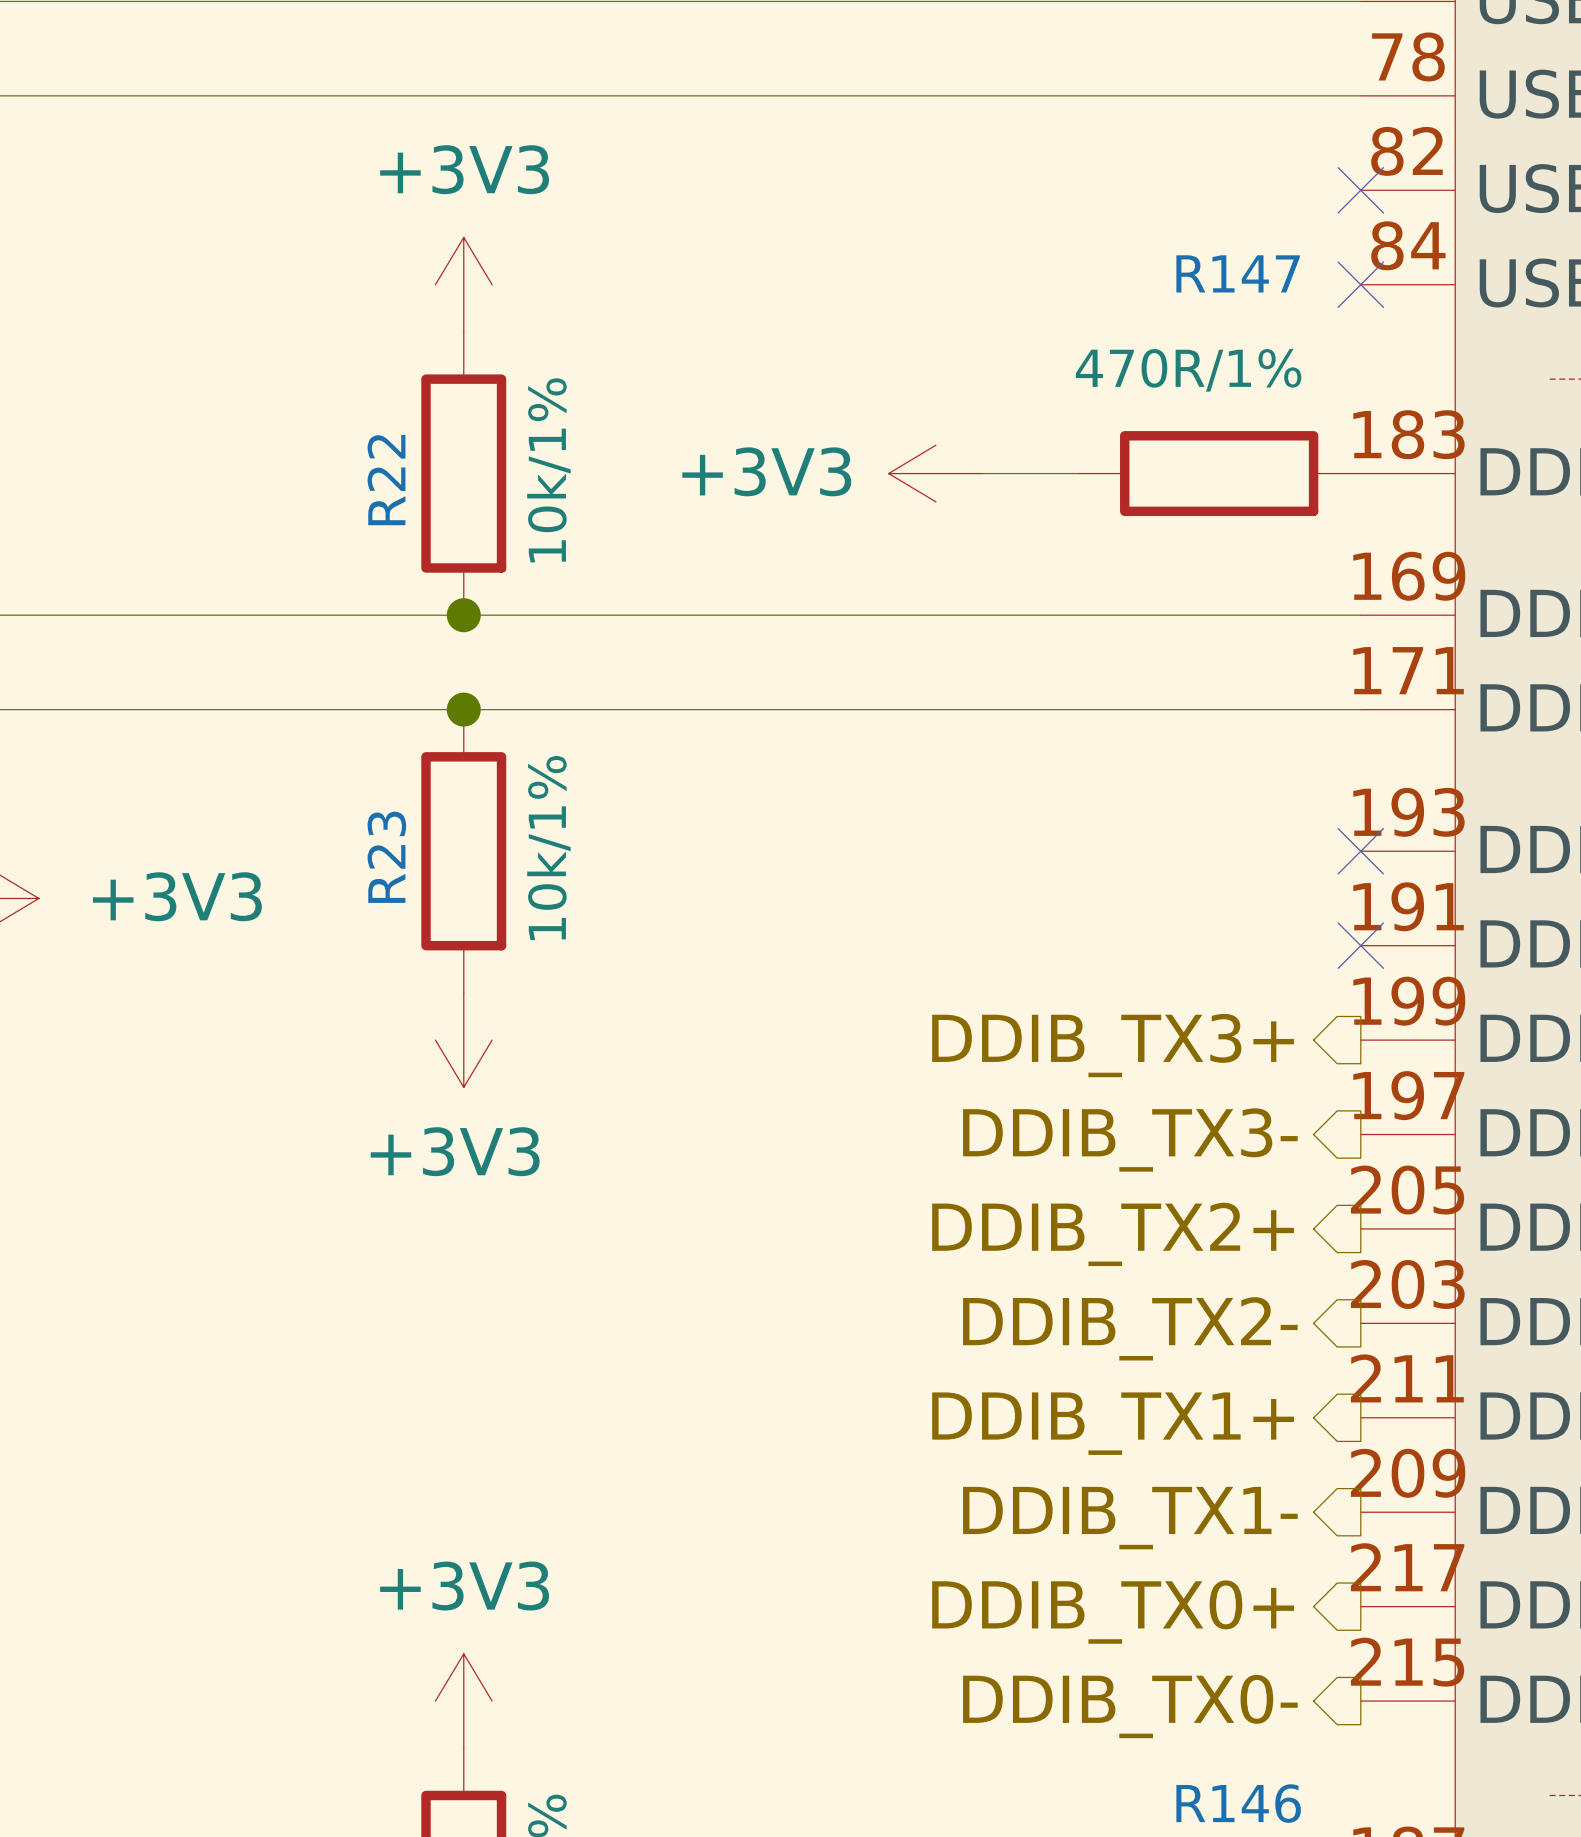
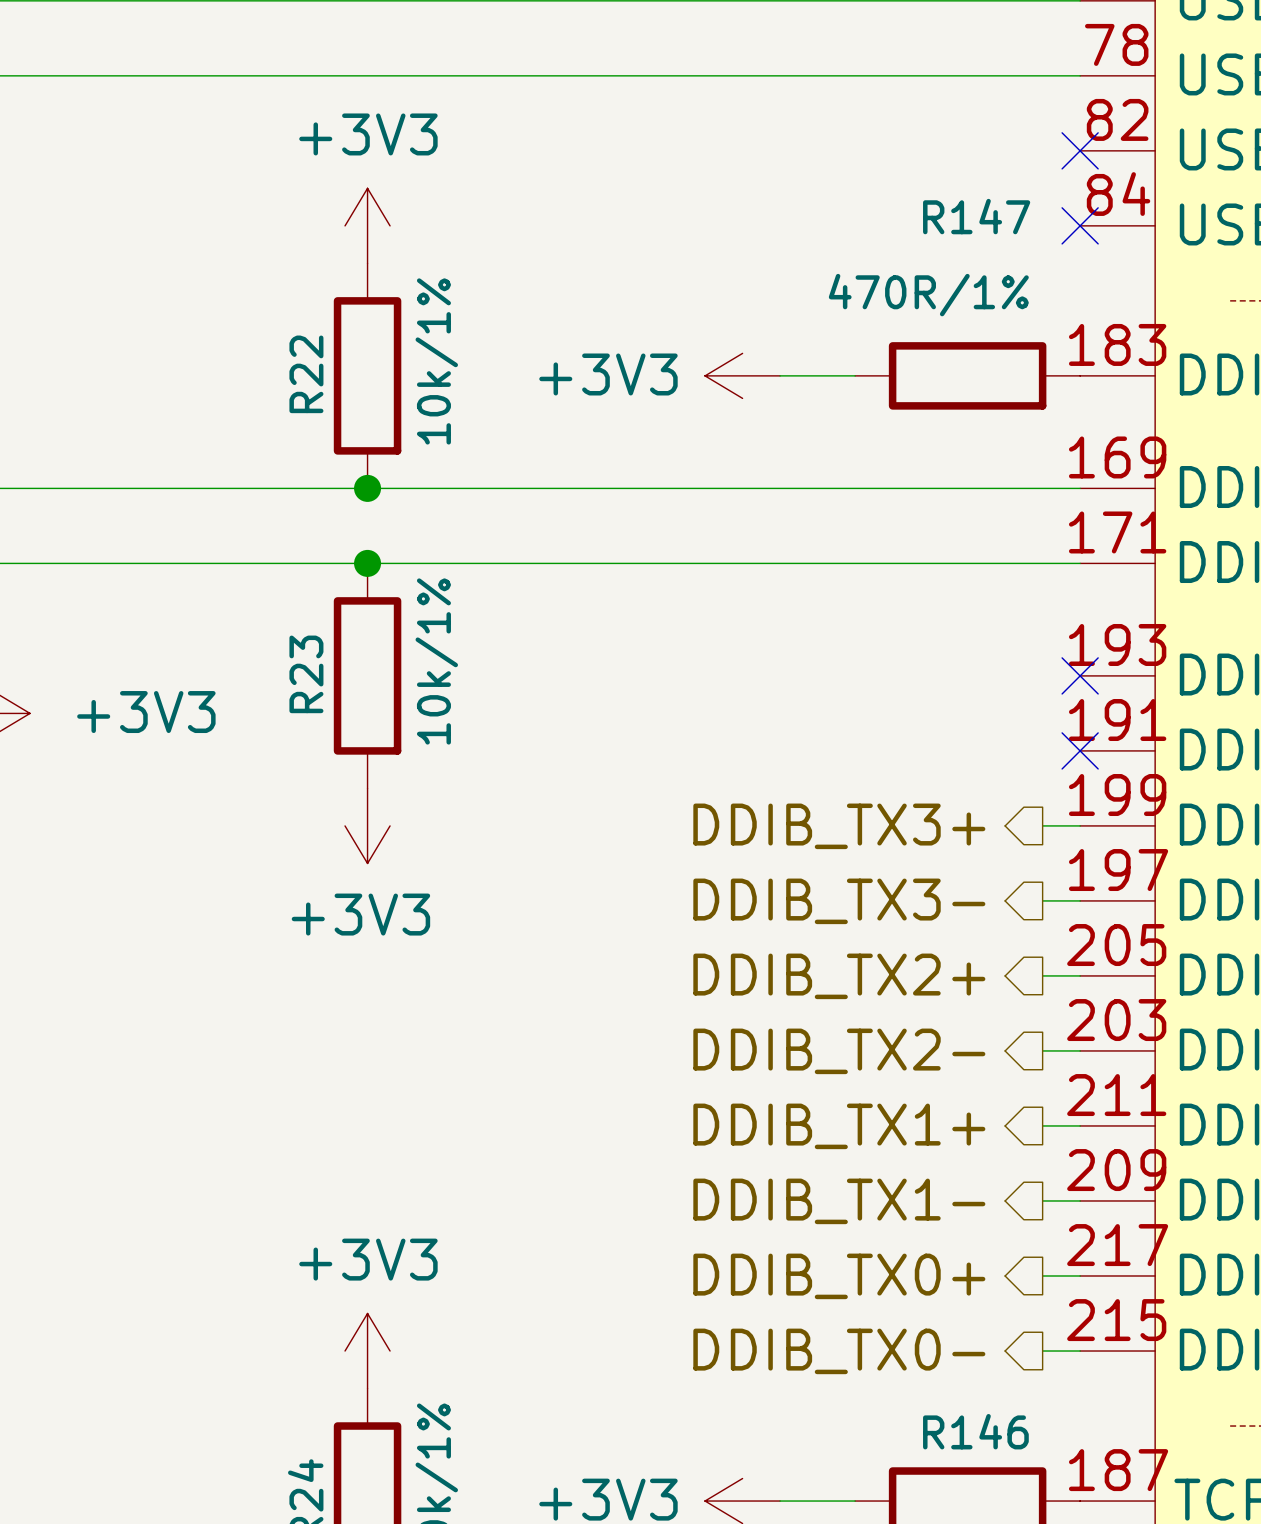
wire: none -> (1042, 825) (1080, 825)
hierarchical label position: DDIB_TX3+ (1113, 1045) -> DDIB_TX3+ (839, 826)
wire: none -> (1042, 900) (1080, 900)
hierarchical label position: DDIB_TX3- (1130, 1139) -> DDIB_TX3- (839, 901)
wire: none -> (1042, 975) (1080, 975)
hierarchical label position: DDIB_TX2+ (1113, 1234) -> DDIB_TX2+ (839, 976)
wire: none -> (1042, 1050) (1080, 1050)
hierarchical label position: DDIB_TX2- (1130, 1328) -> DDIB_TX2- (839, 1051)
wire: none -> (1042, 1125) (1080, 1125)
hierarchical label position: DDIB_TX1+ (1113, 1423) -> DDIB_TX1+ (839, 1126)
wire: none -> (1042, 1200) (1080, 1200)
hierarchical label position: DDIB_TX1- (1130, 1518) -> DDIB_TX1- (839, 1201)
wire: none -> (1042, 1275) (1080, 1275)
hierarchical label position: DDIB_TX0+ (1113, 1612) -> DDIB_TX0+ (839, 1276)
wire: none -> (1042, 1351) (1080, 1351)
hierarchical label position: DDIB_TX0- (1130, 1706) -> DDIB_TX0- (839, 1351)

